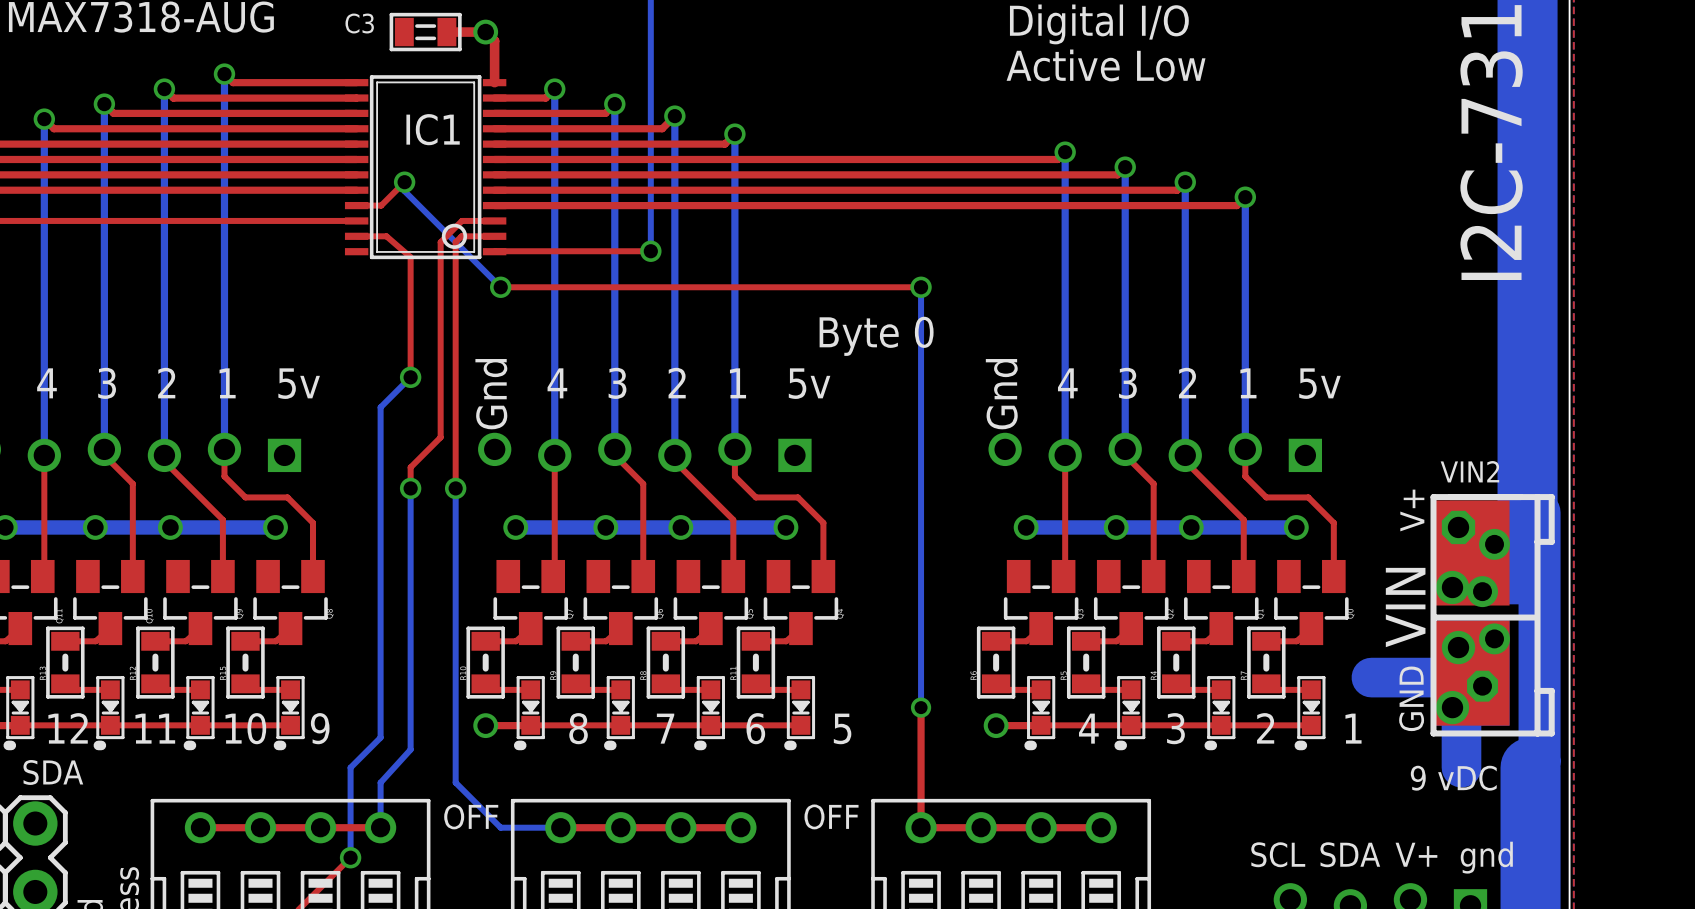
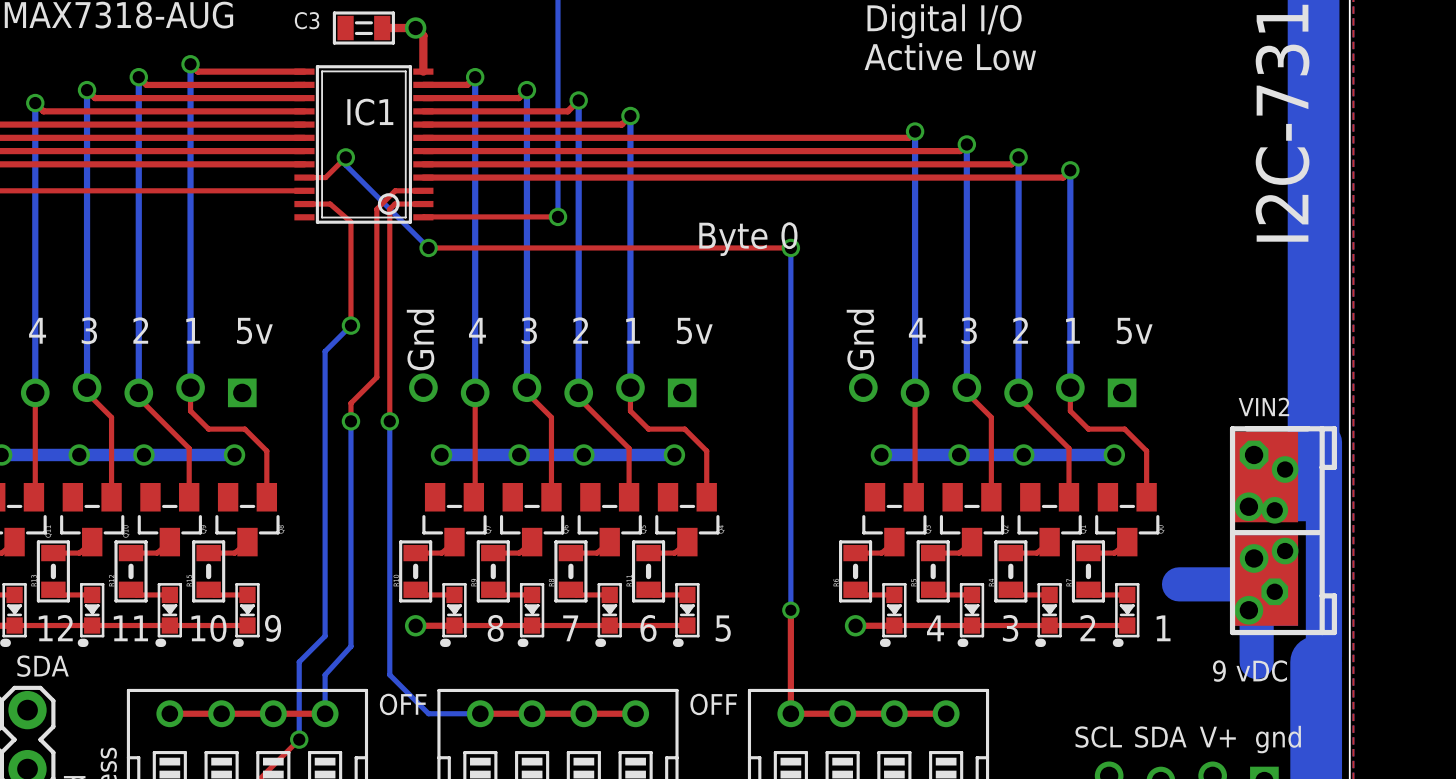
text position: Byte 0 (876, 336) -> Byte 0 (748, 239)
VIN2 text: V+ (1412, 510) -> none
VIN2 text: VIN (1405, 607) -> none
VIN2 text: GND (1411, 698) -> none

